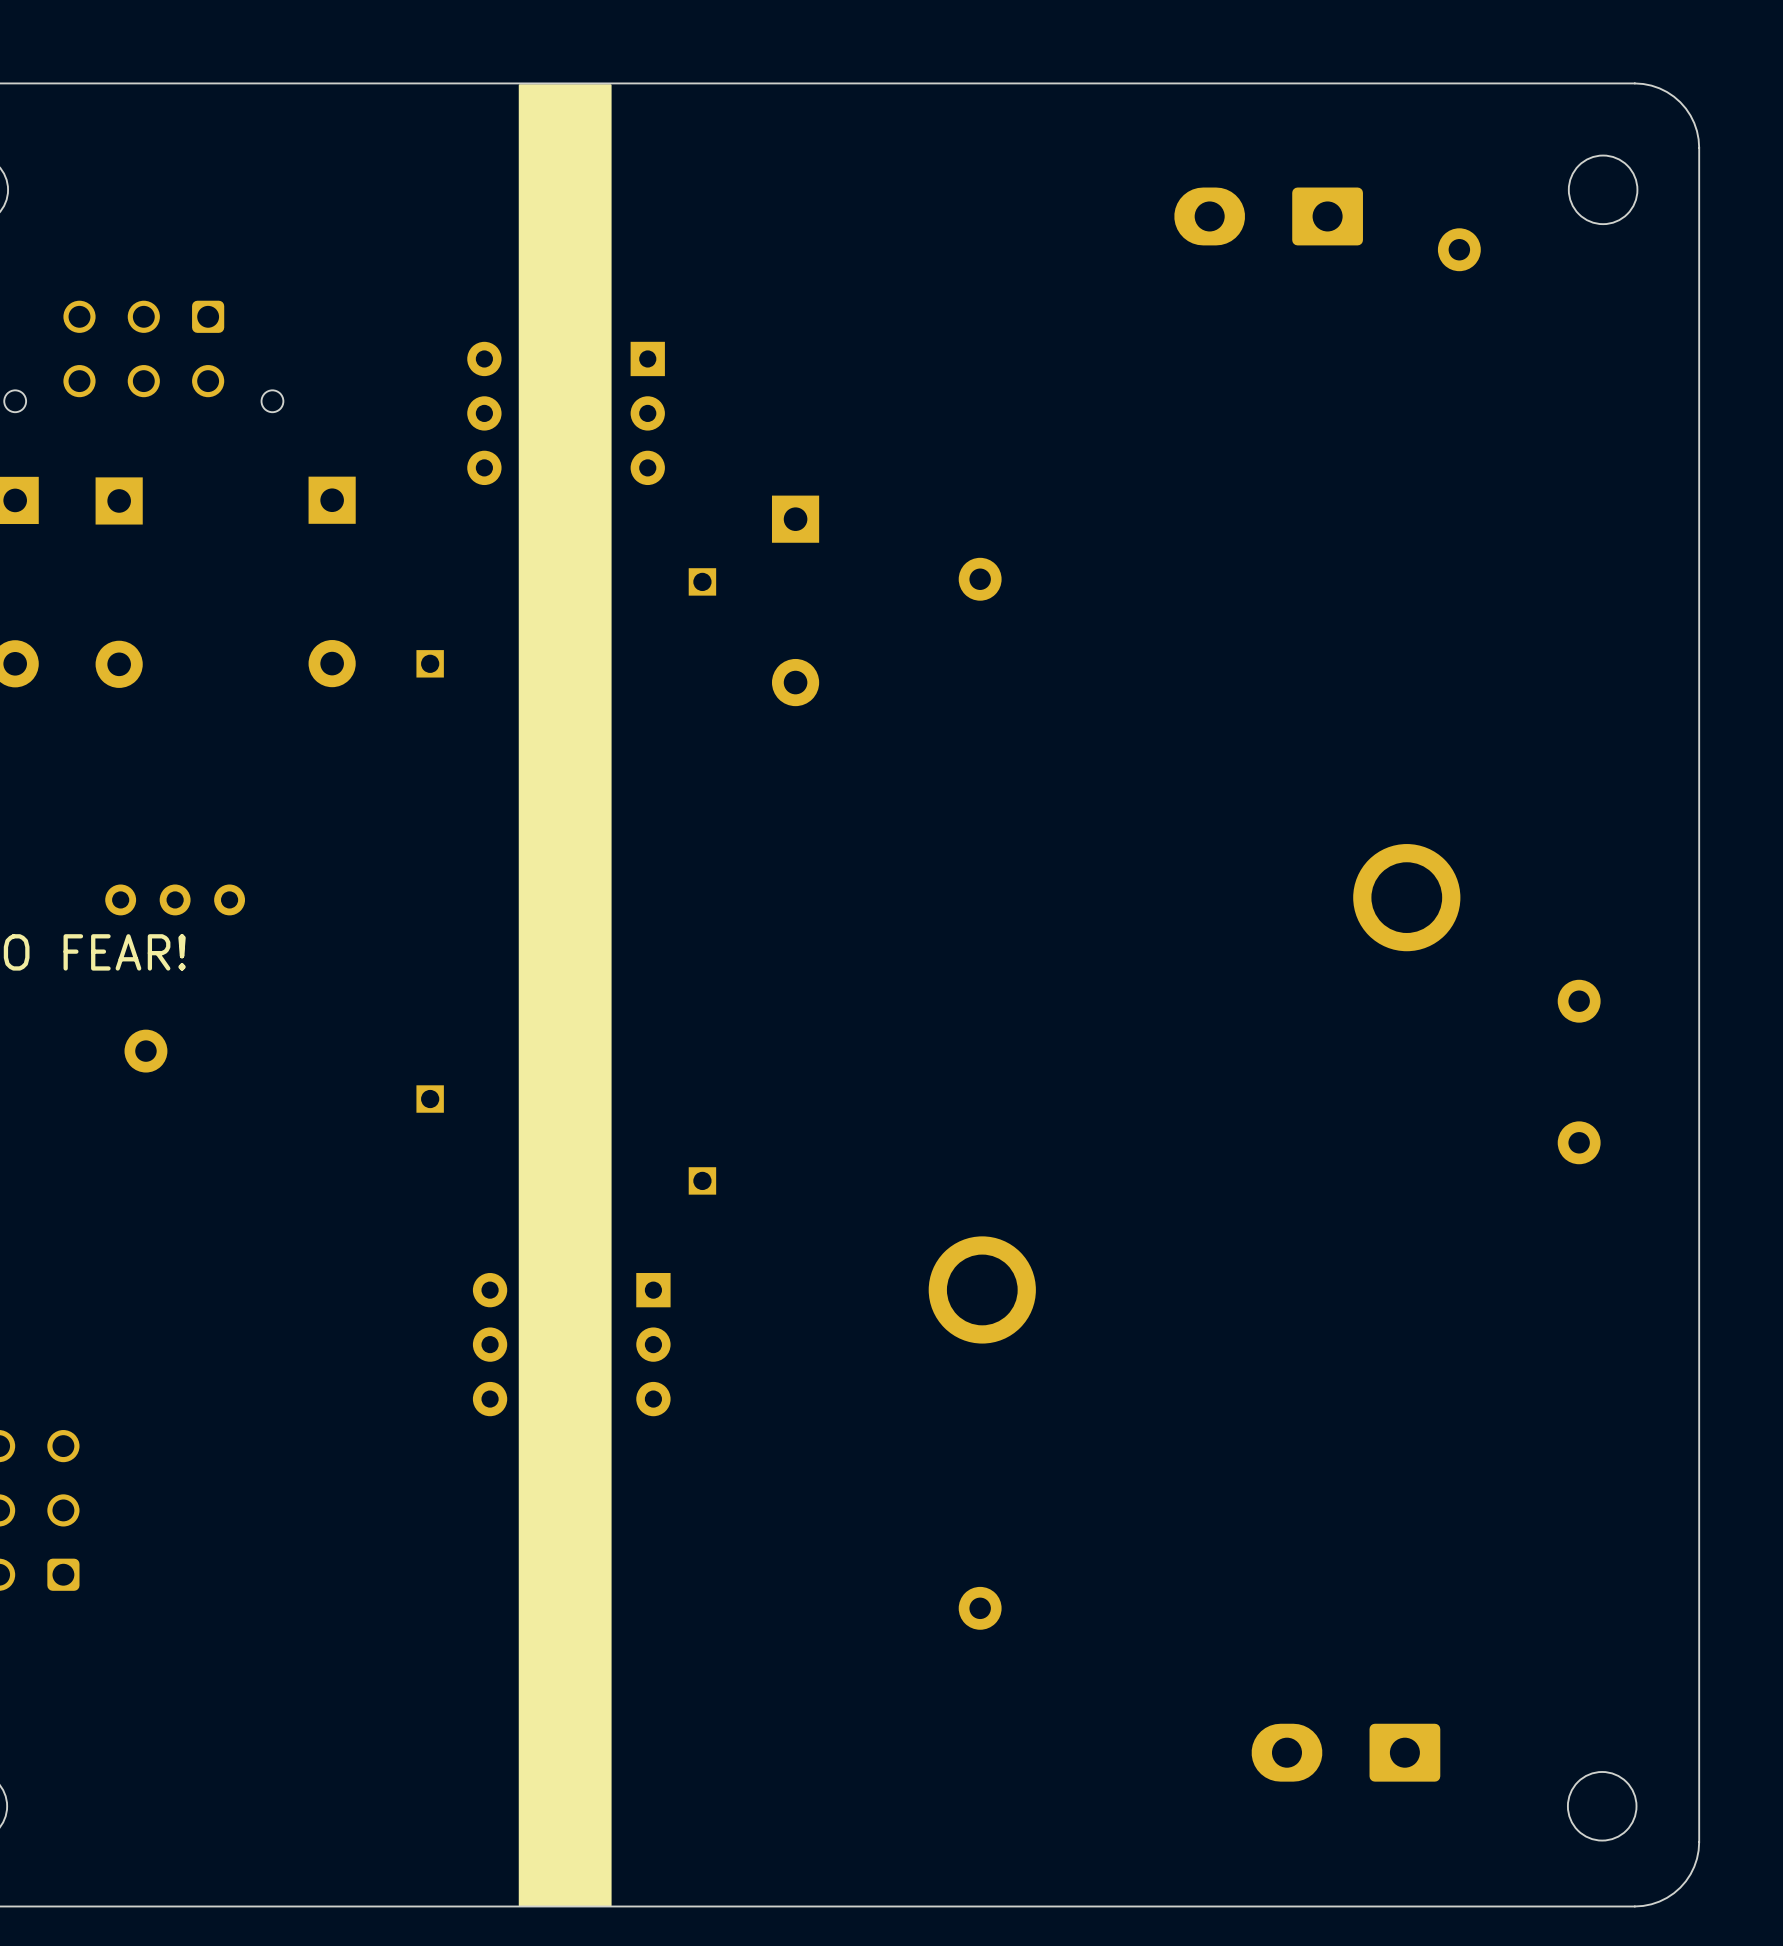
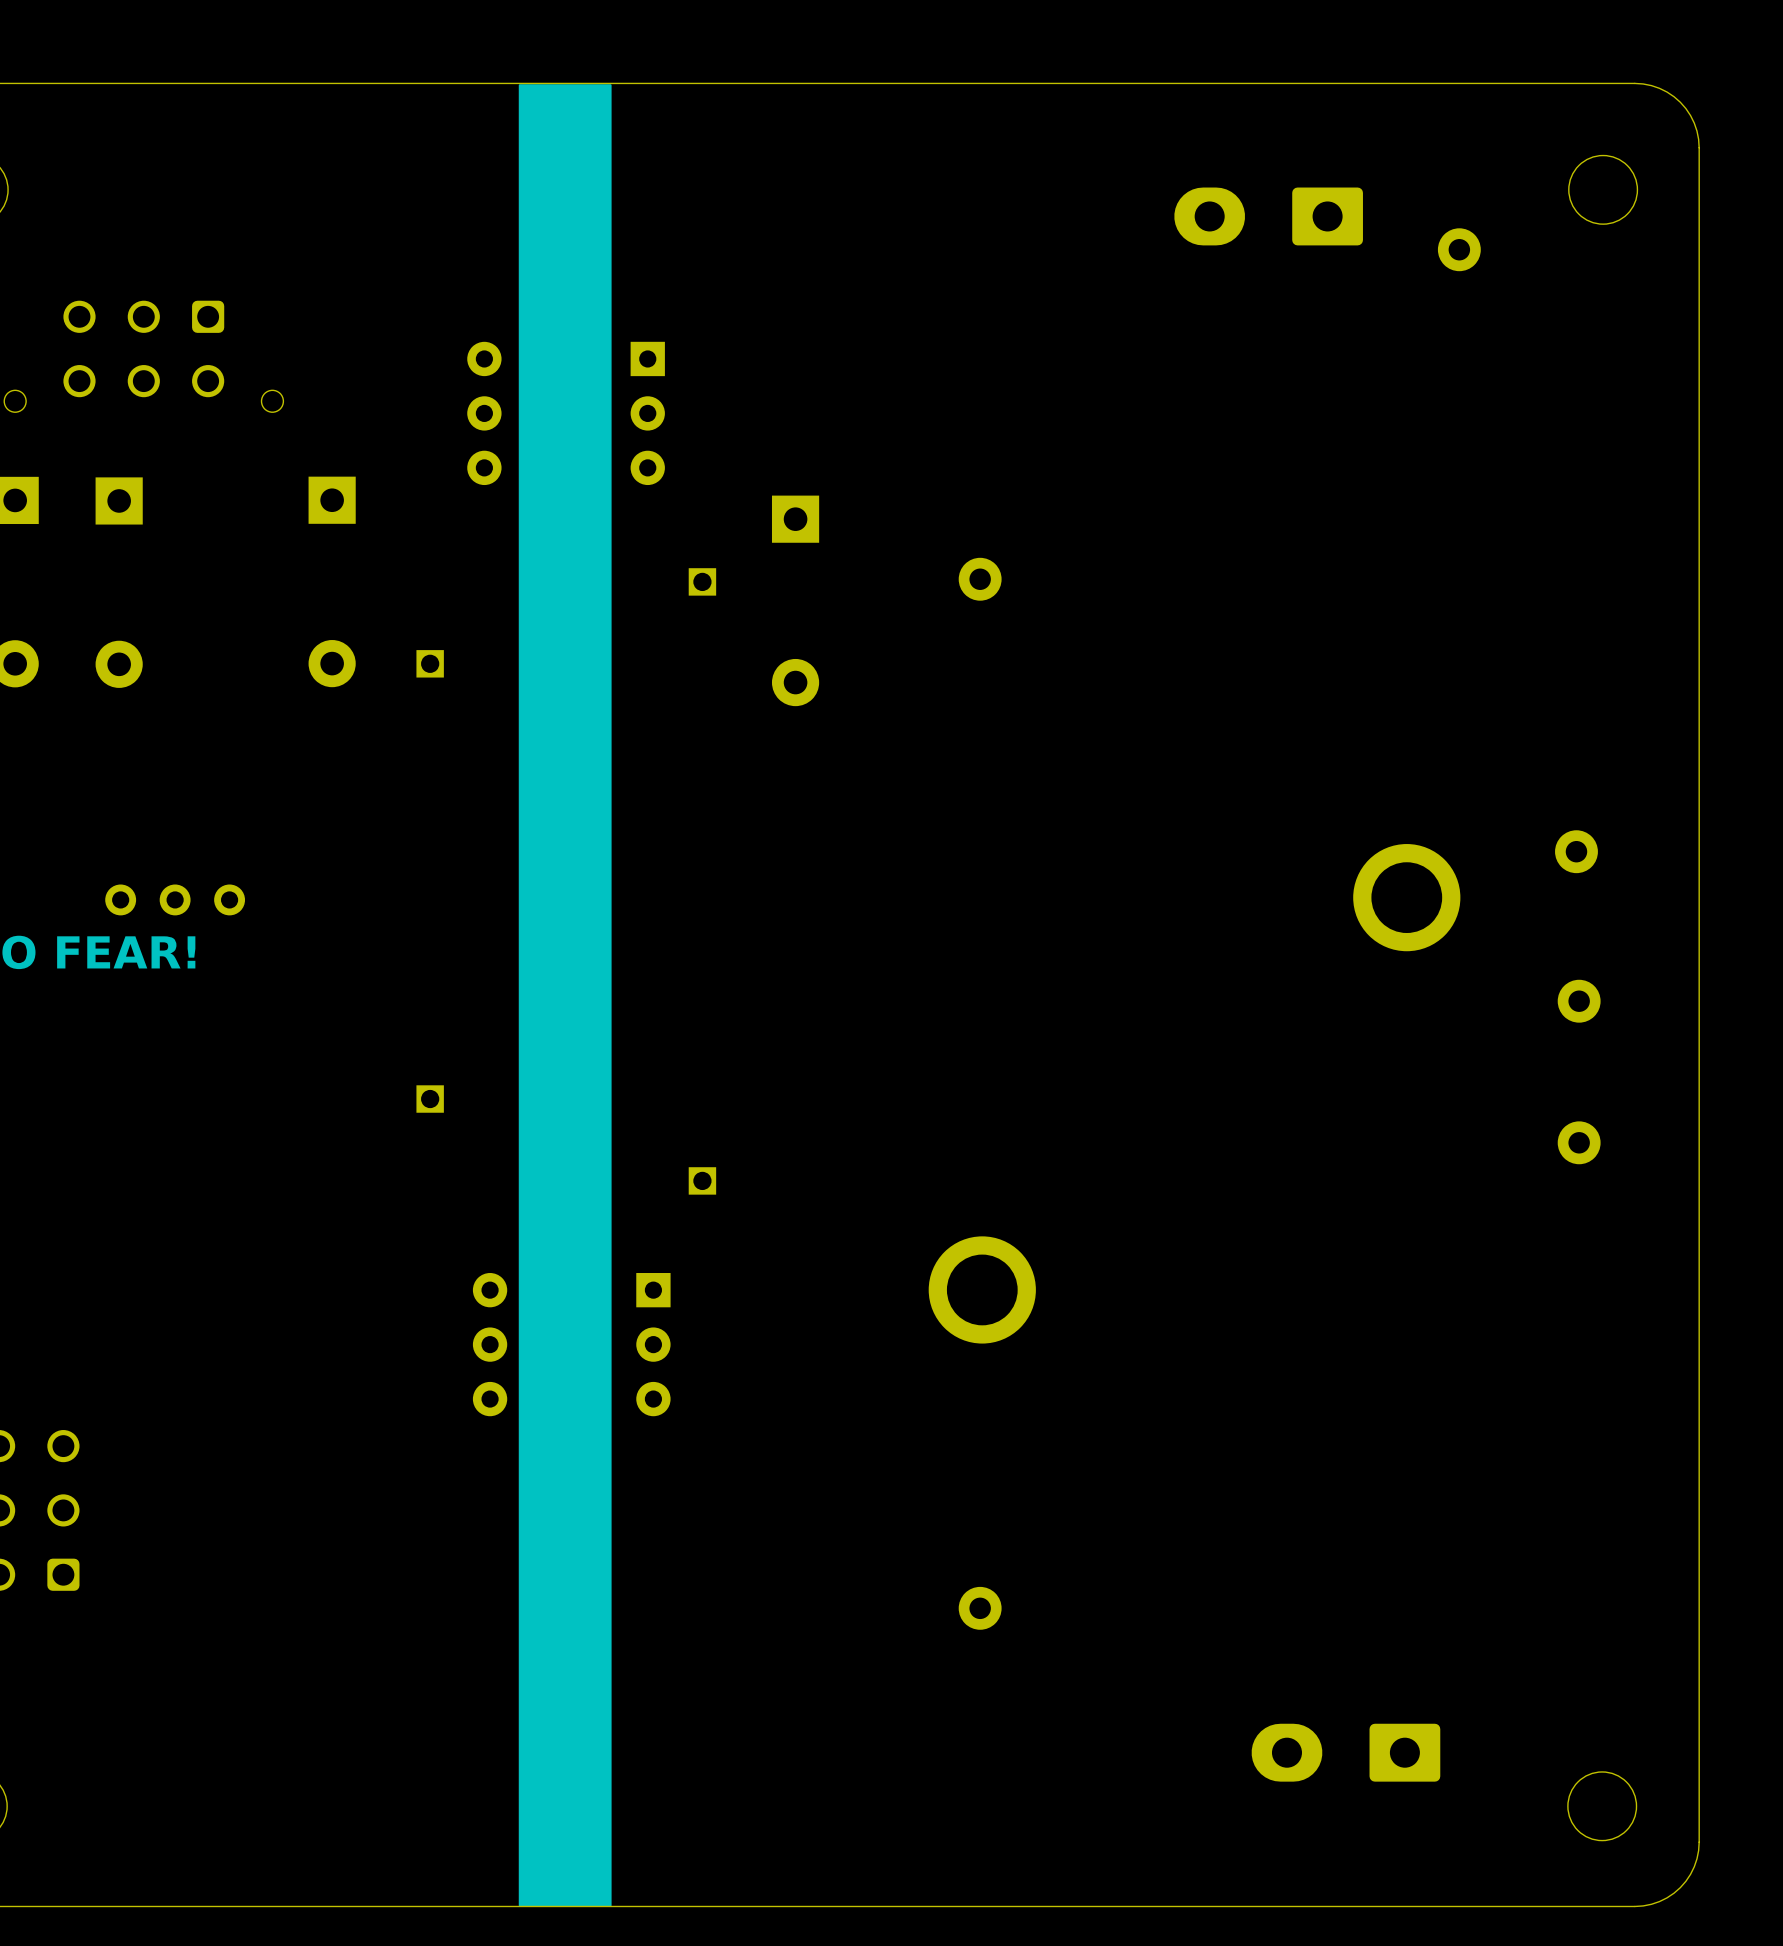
part: none -> (1576, 851)
part: (145, 1051) -> none

